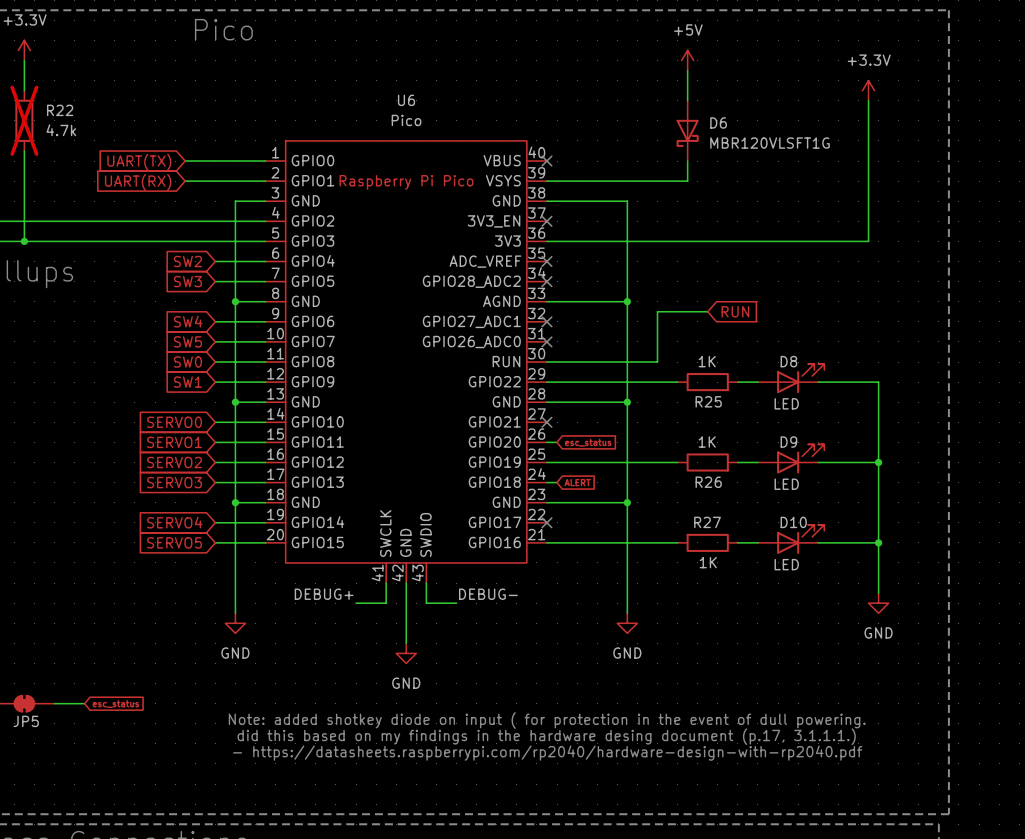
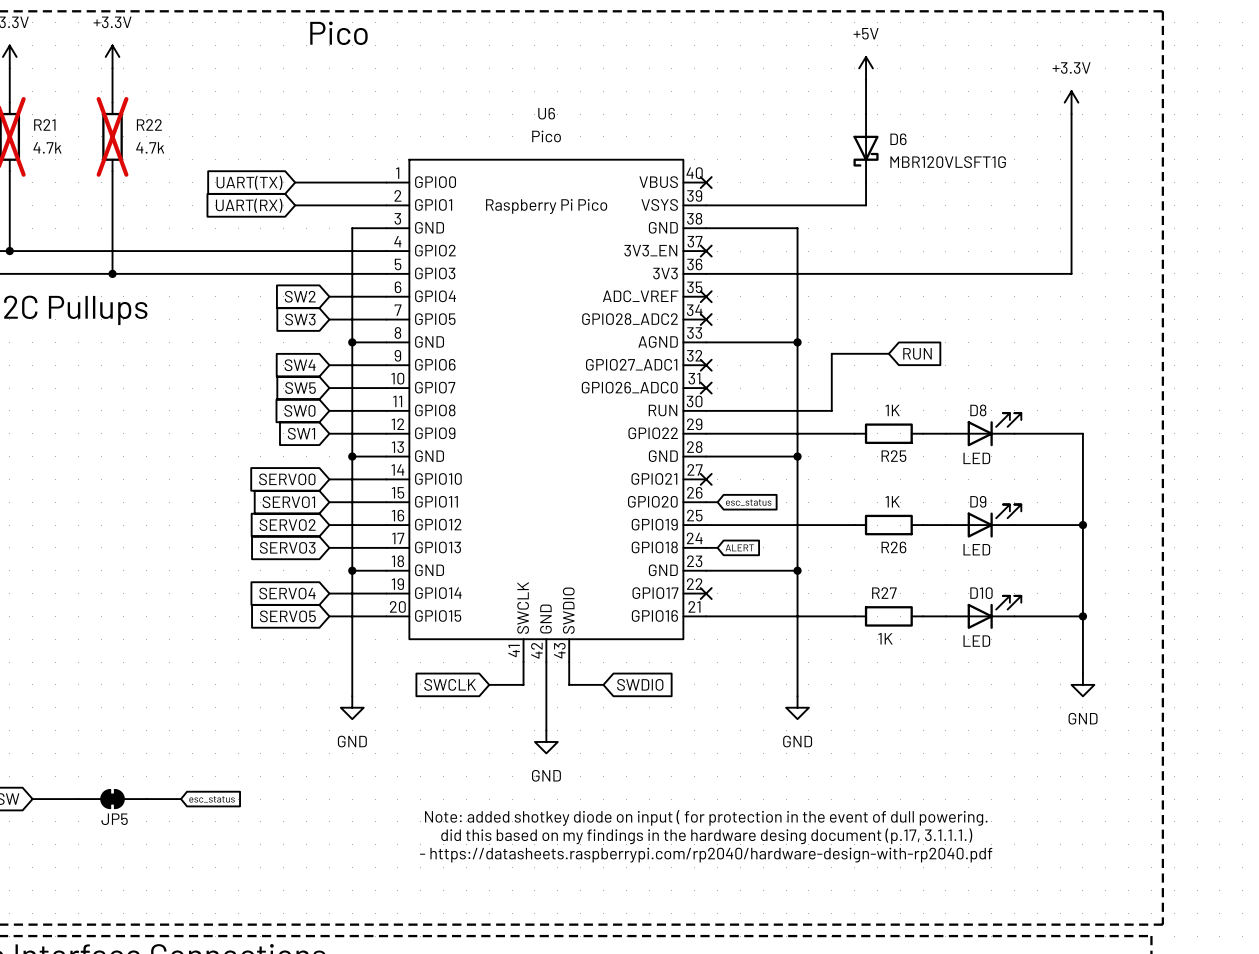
label: DEBUG+ (324, 594) -> none
label: DEBUG- (488, 594) -> none
global label: none -> SWCLK (450, 684)
global label: none -> SWDIO (640, 684)

